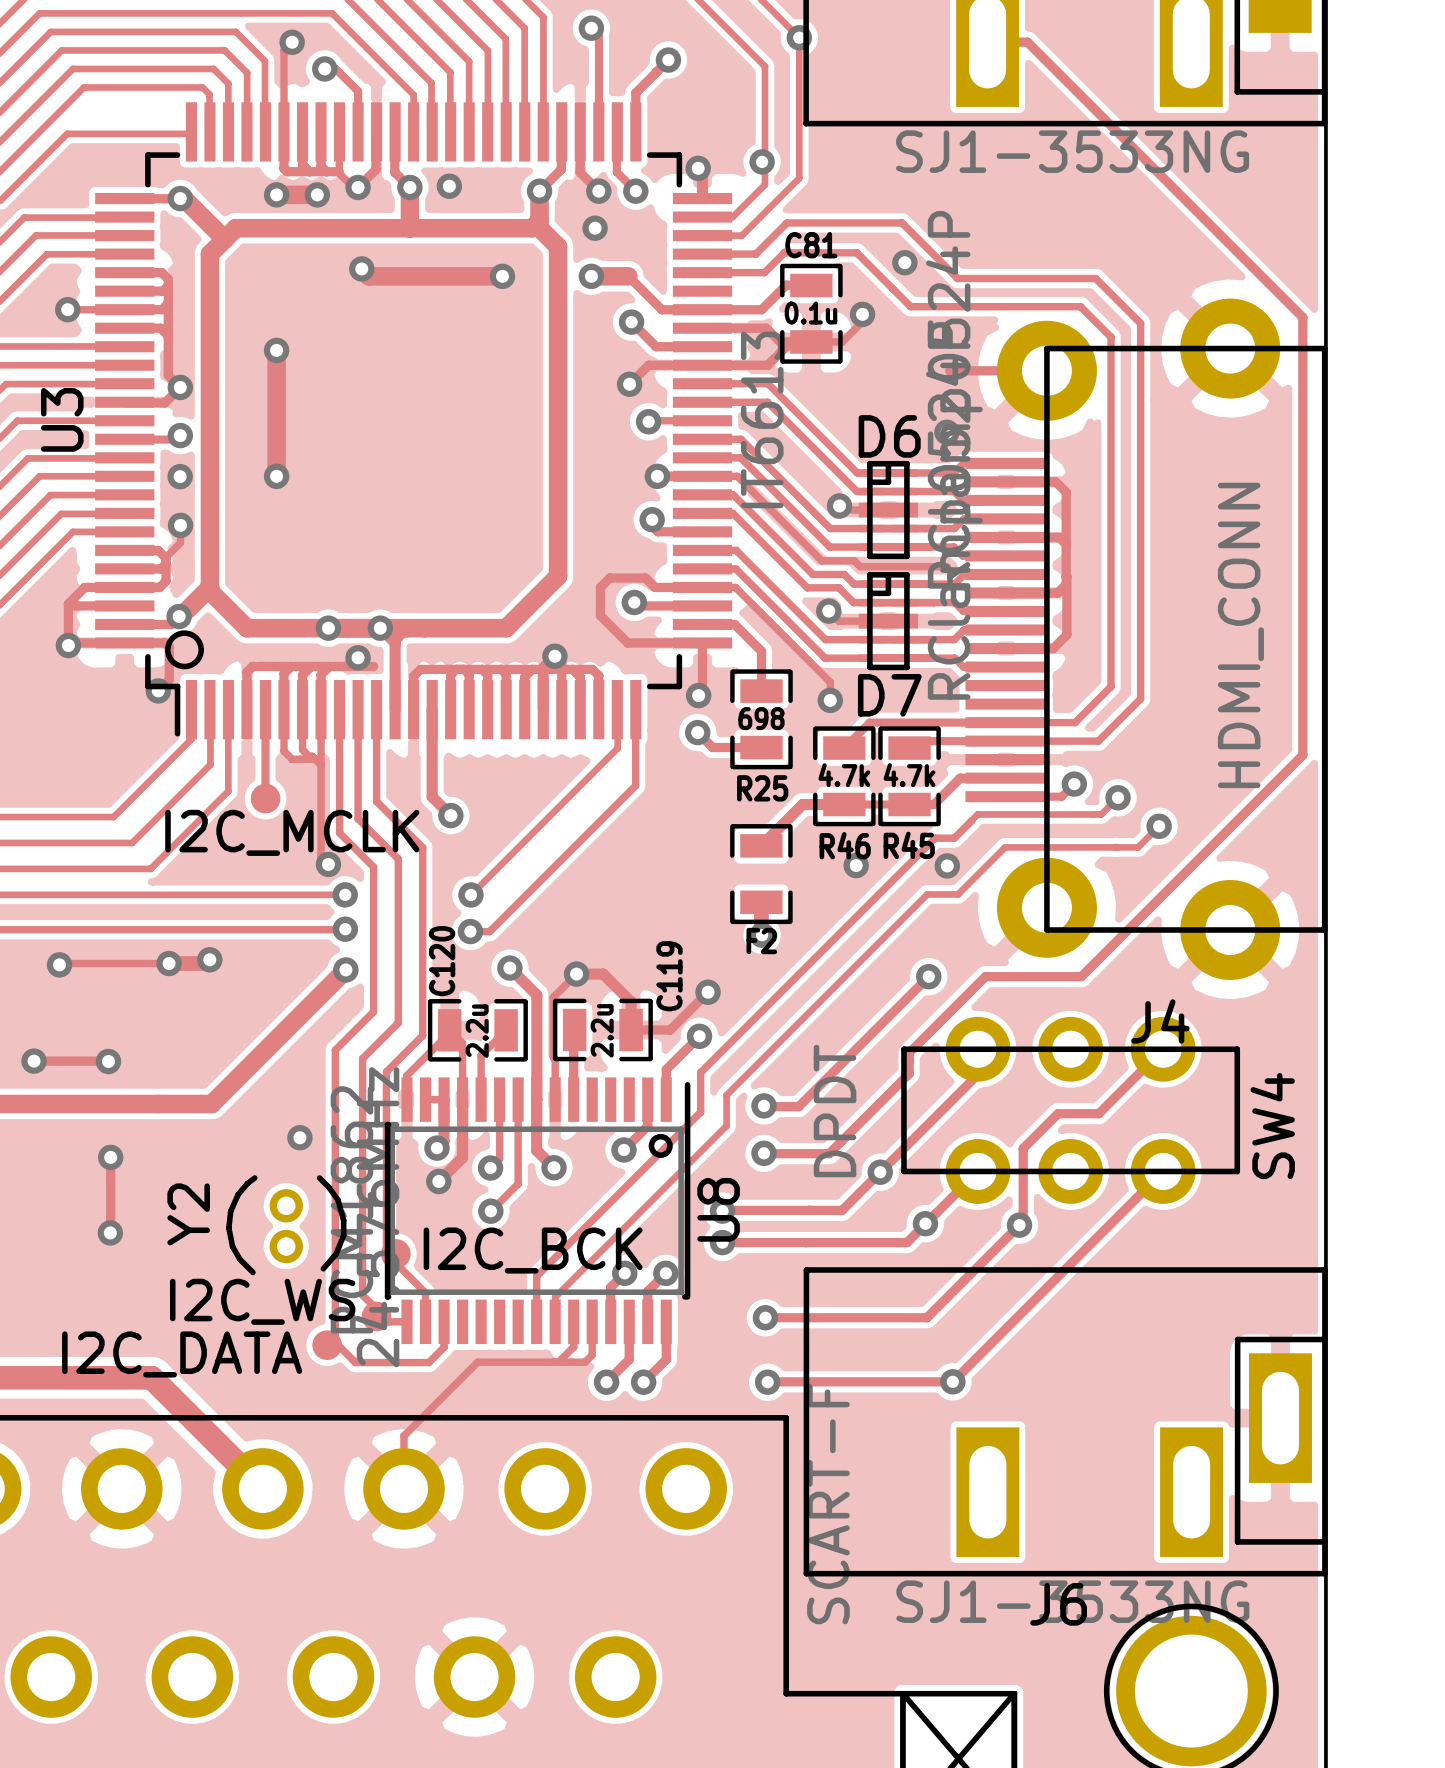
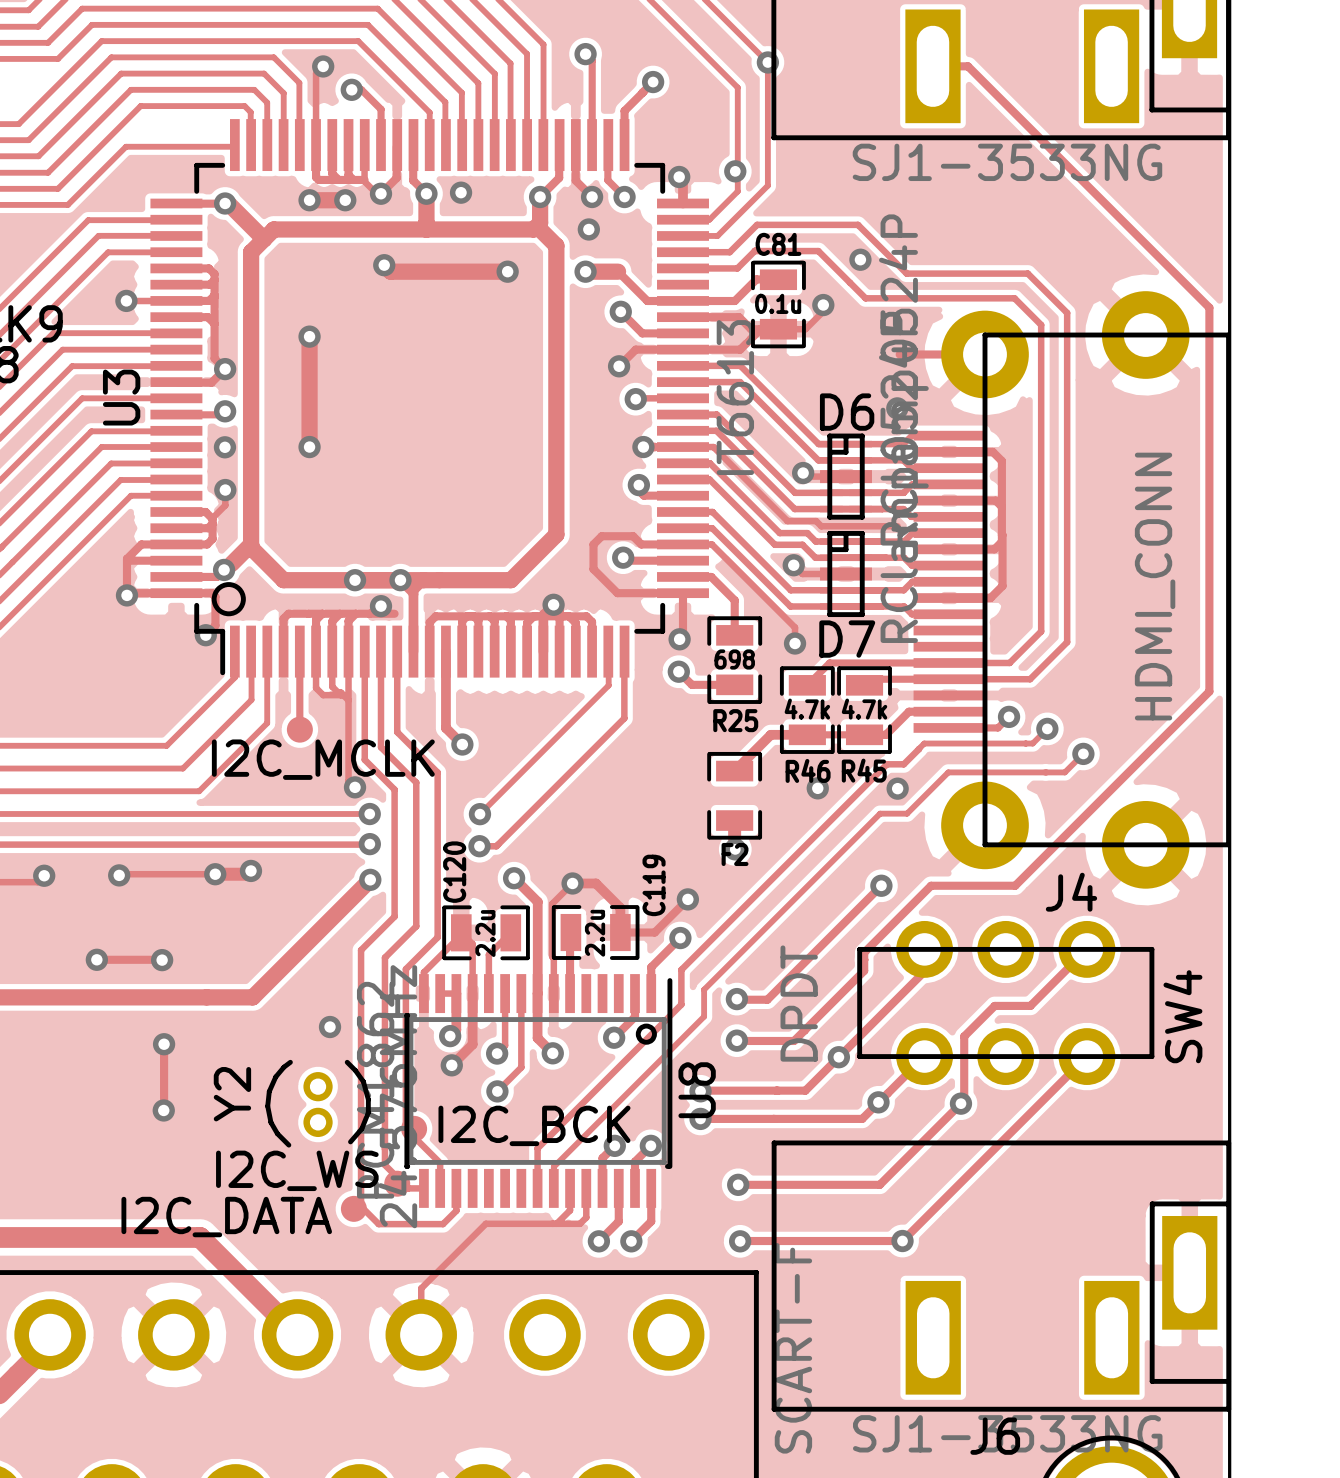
J4 name position: J4 (1160, 1021) -> J4 (1071, 892)

